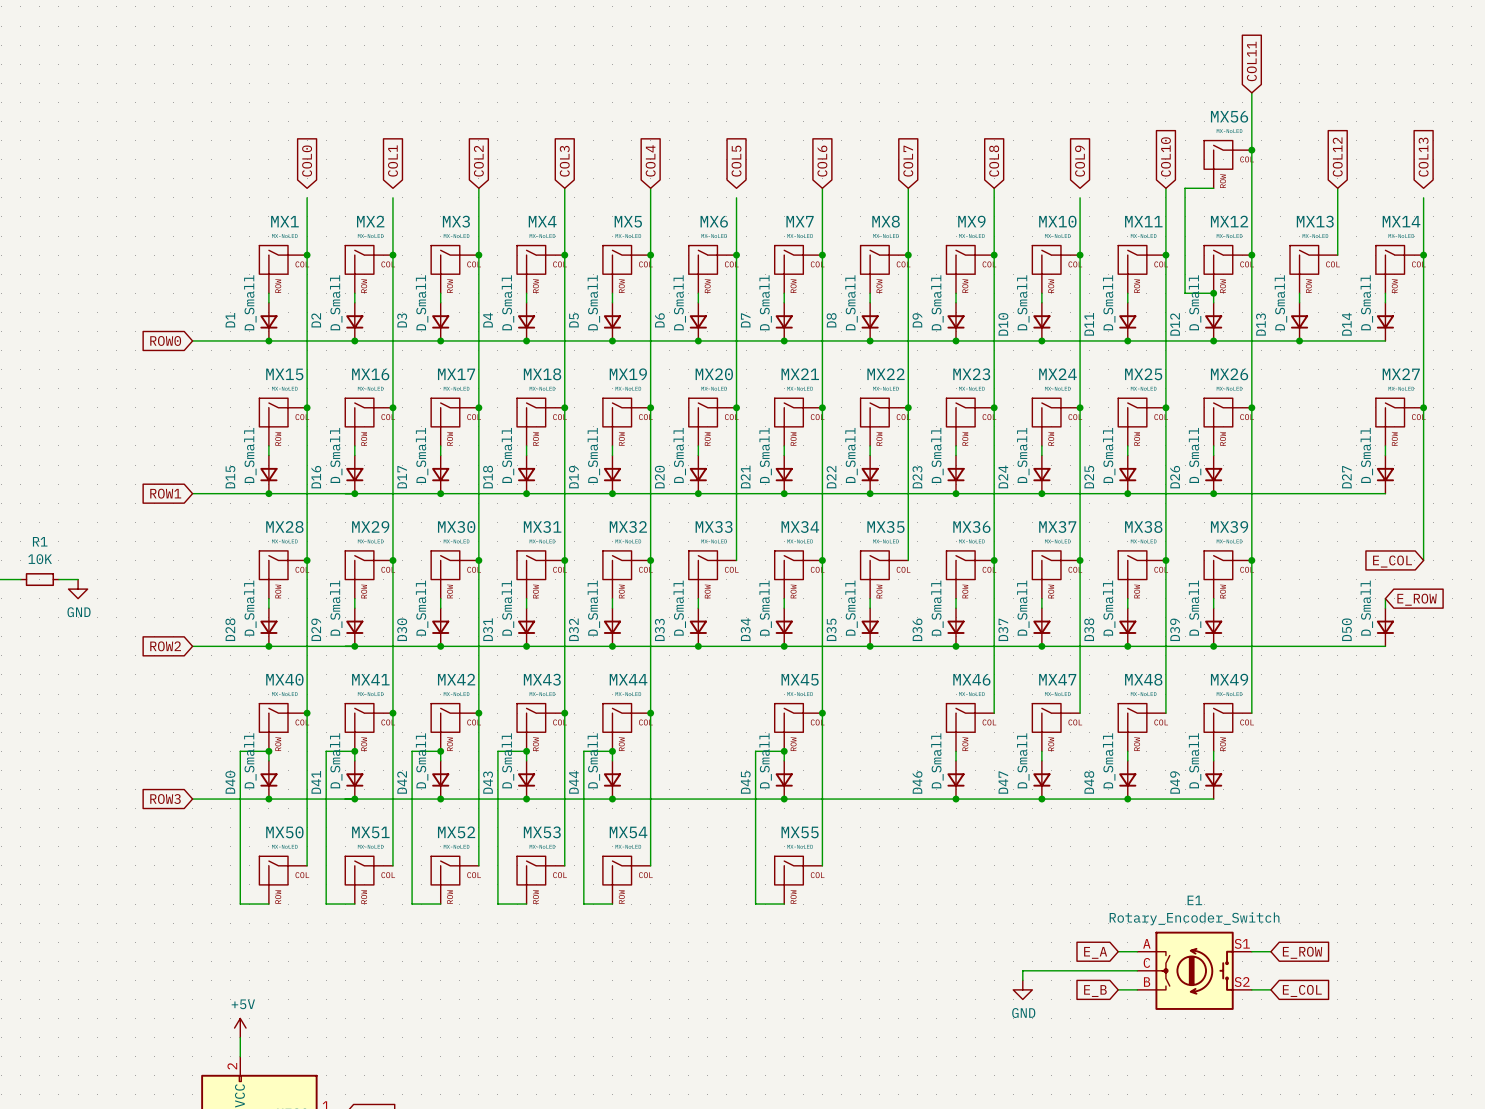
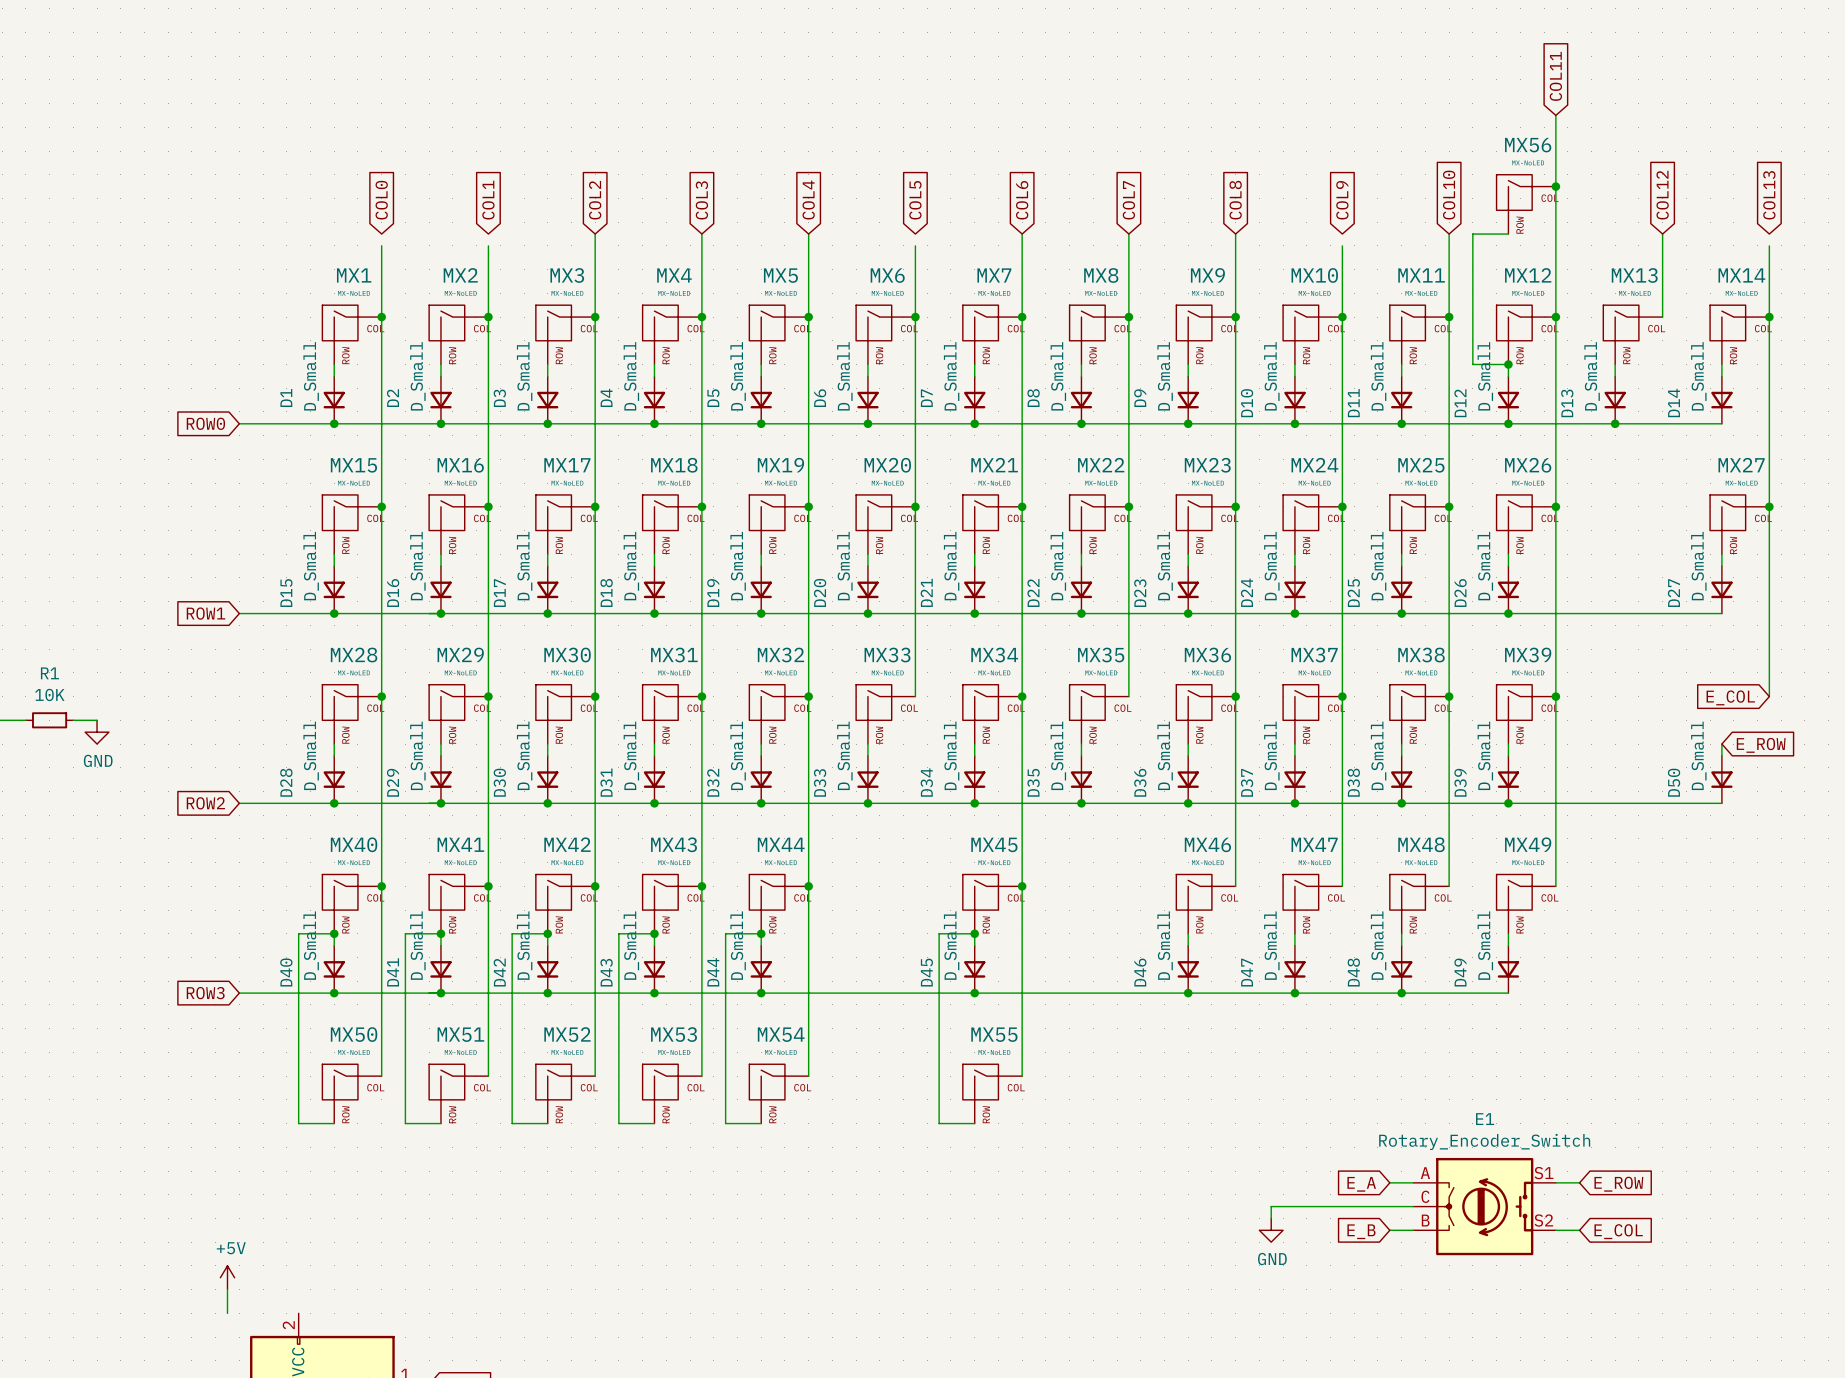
power symbol position: +5V (240, 1028) -> +5V (227, 1277)
wire: (240, 1037) (240, 1056) -> (227, 1289) (227, 1313)

